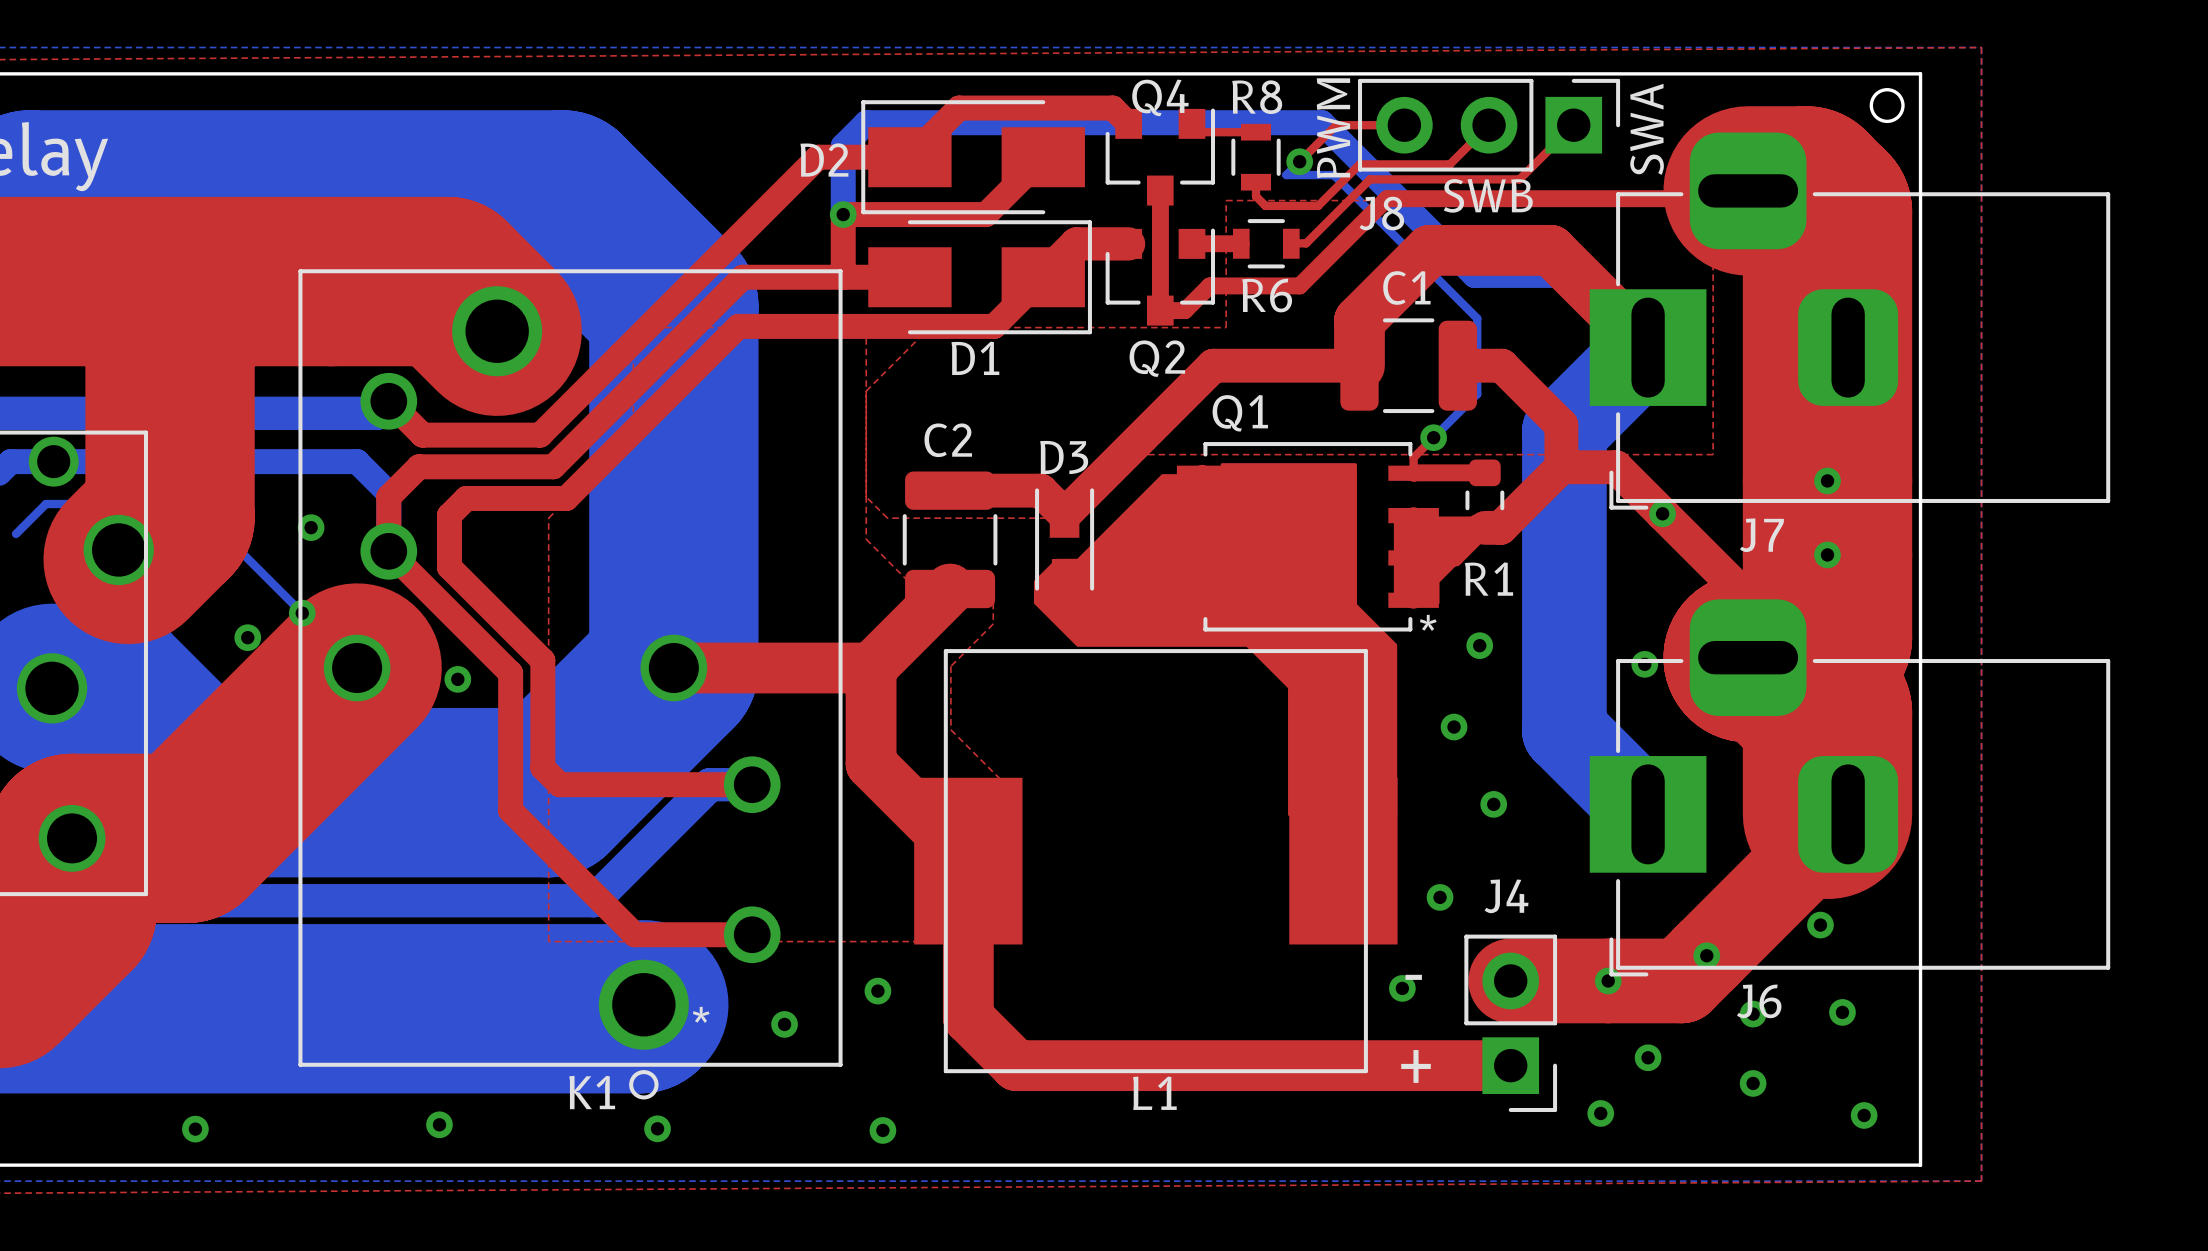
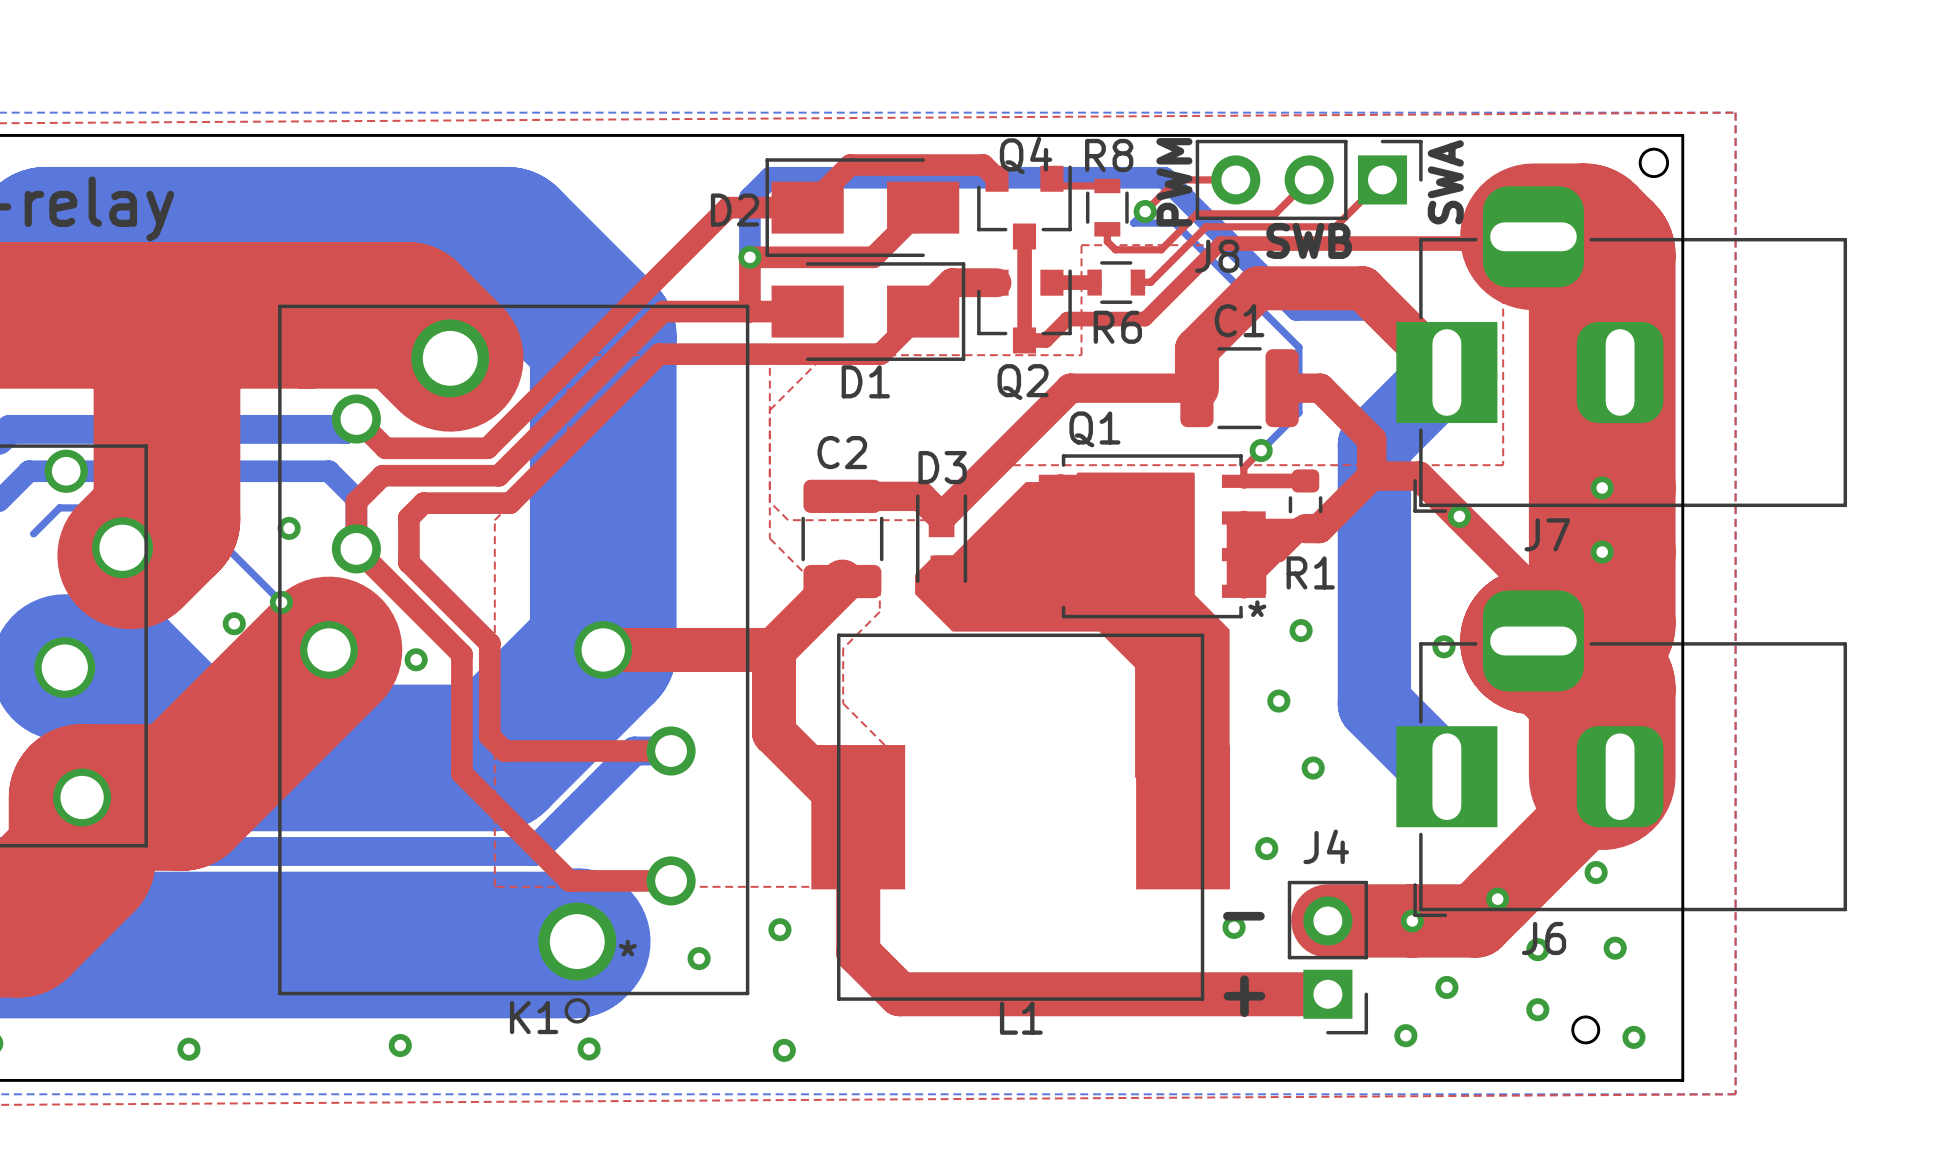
round board edge: none -> [1571, 1015, 1601, 1045]

